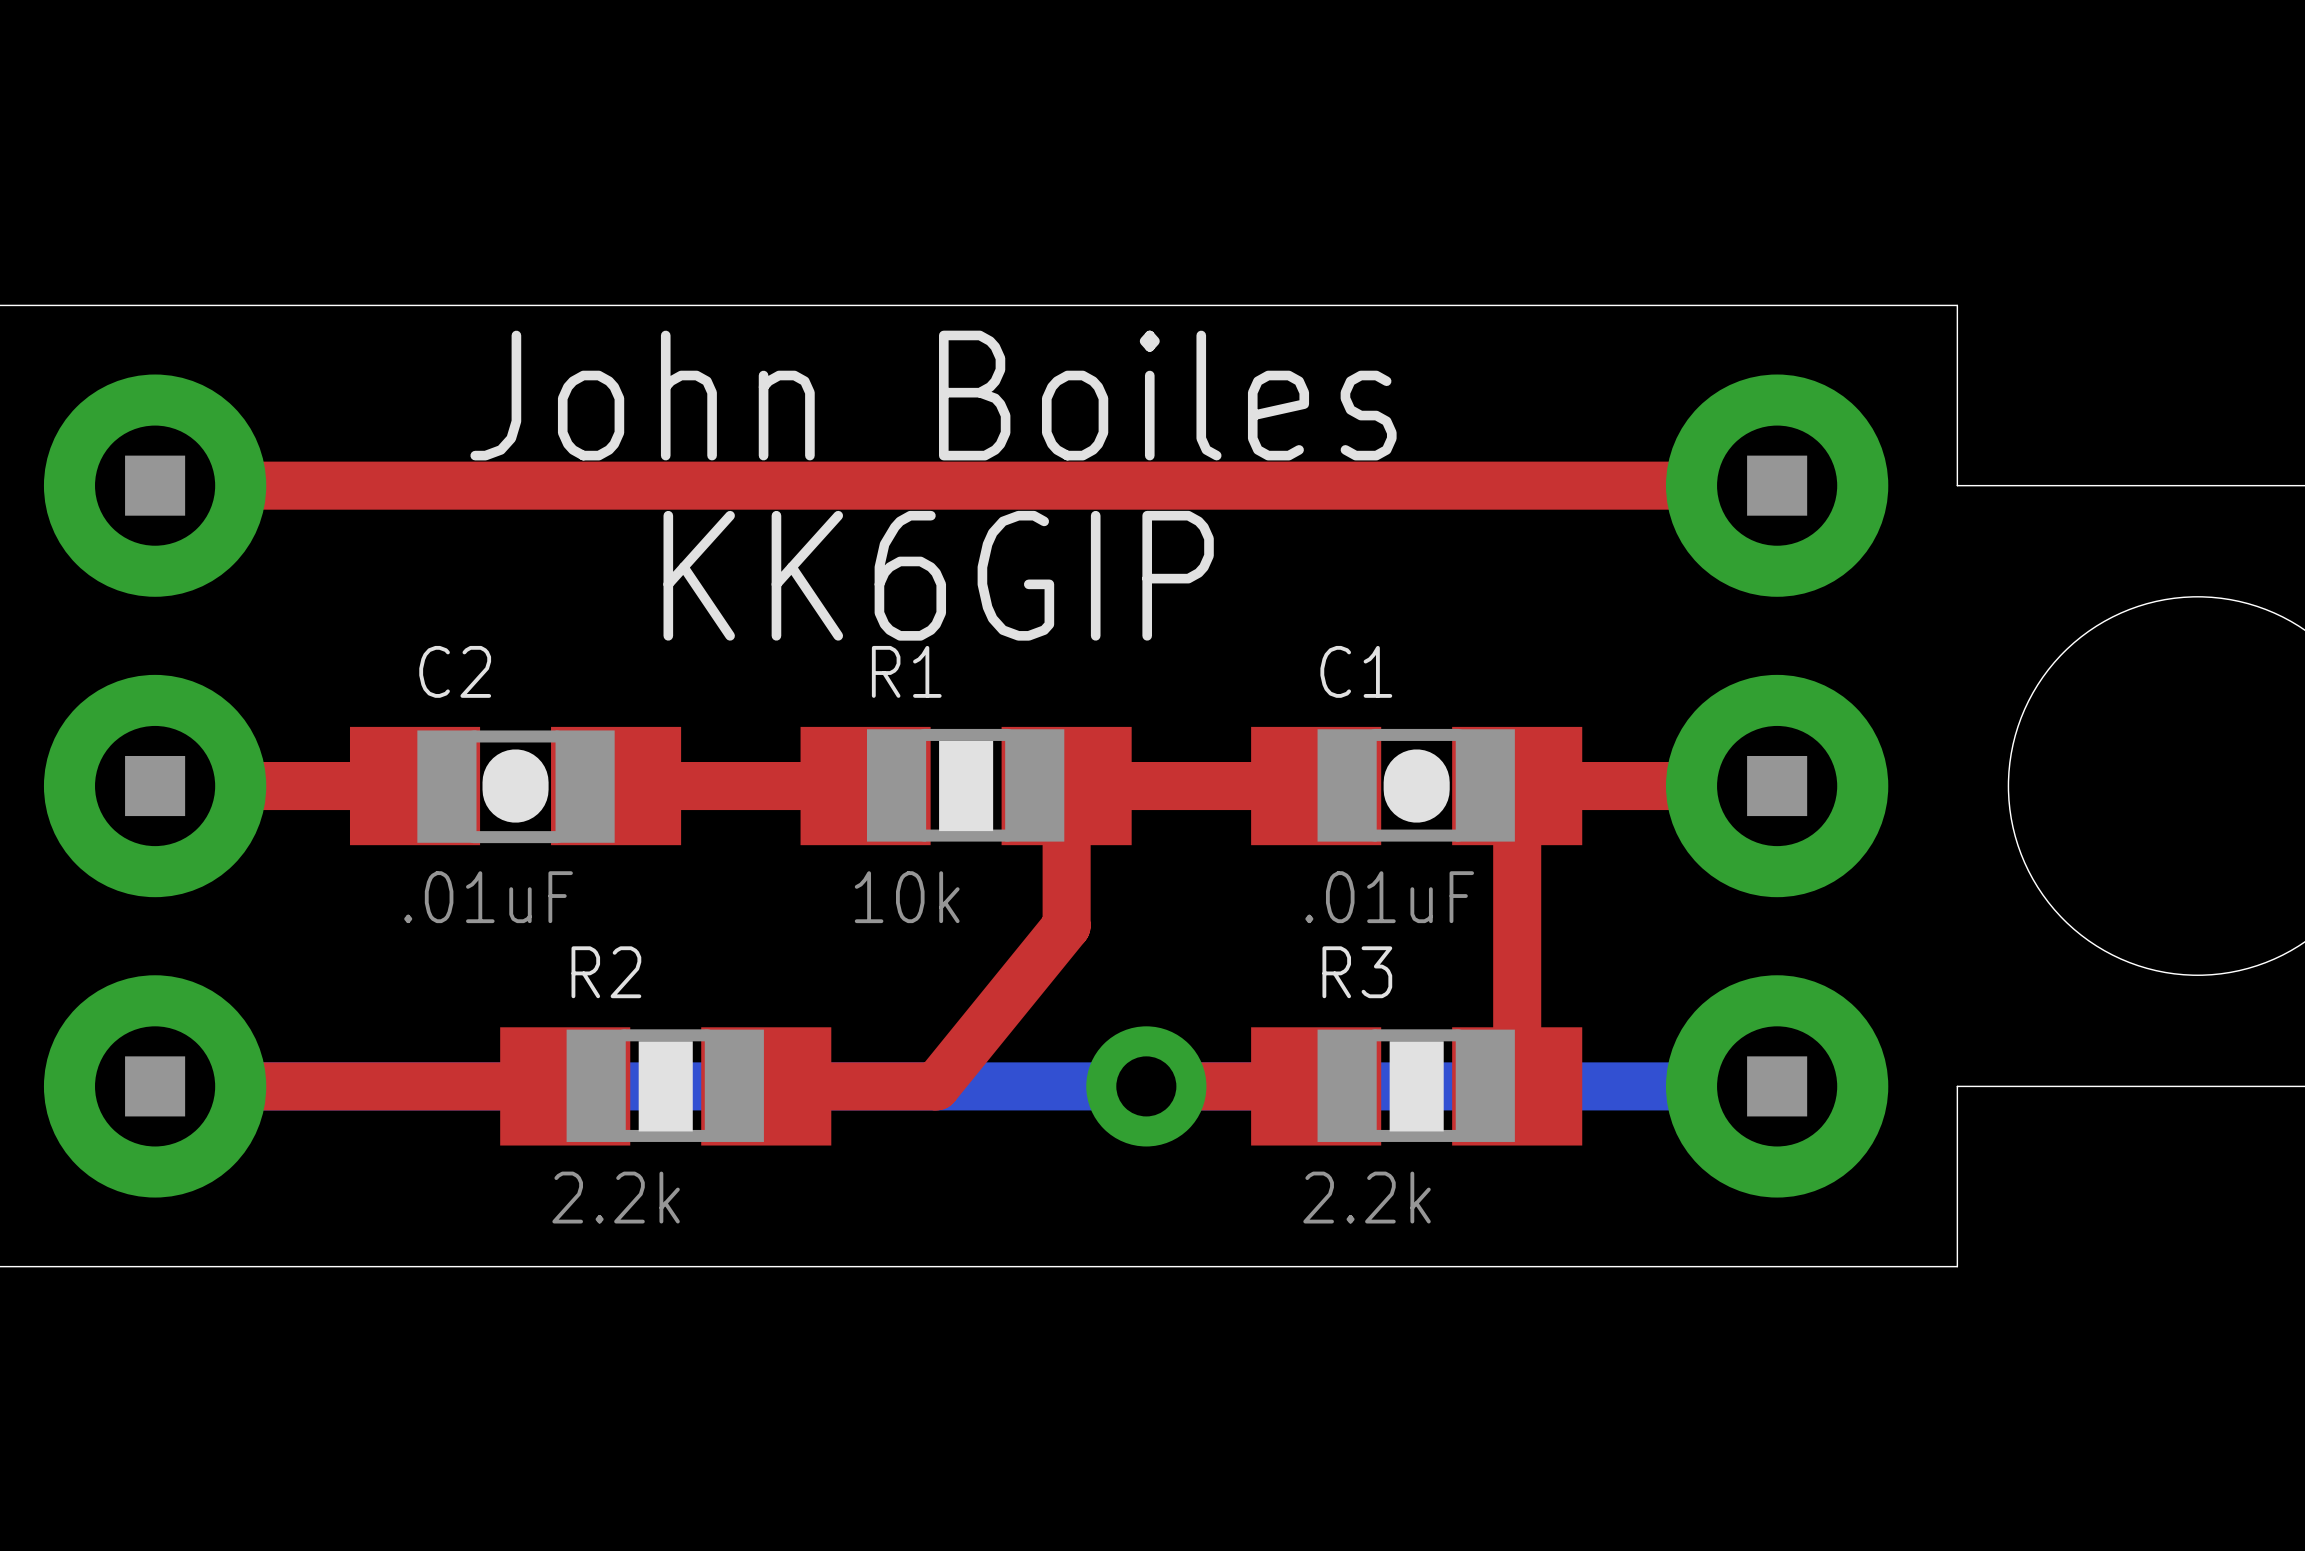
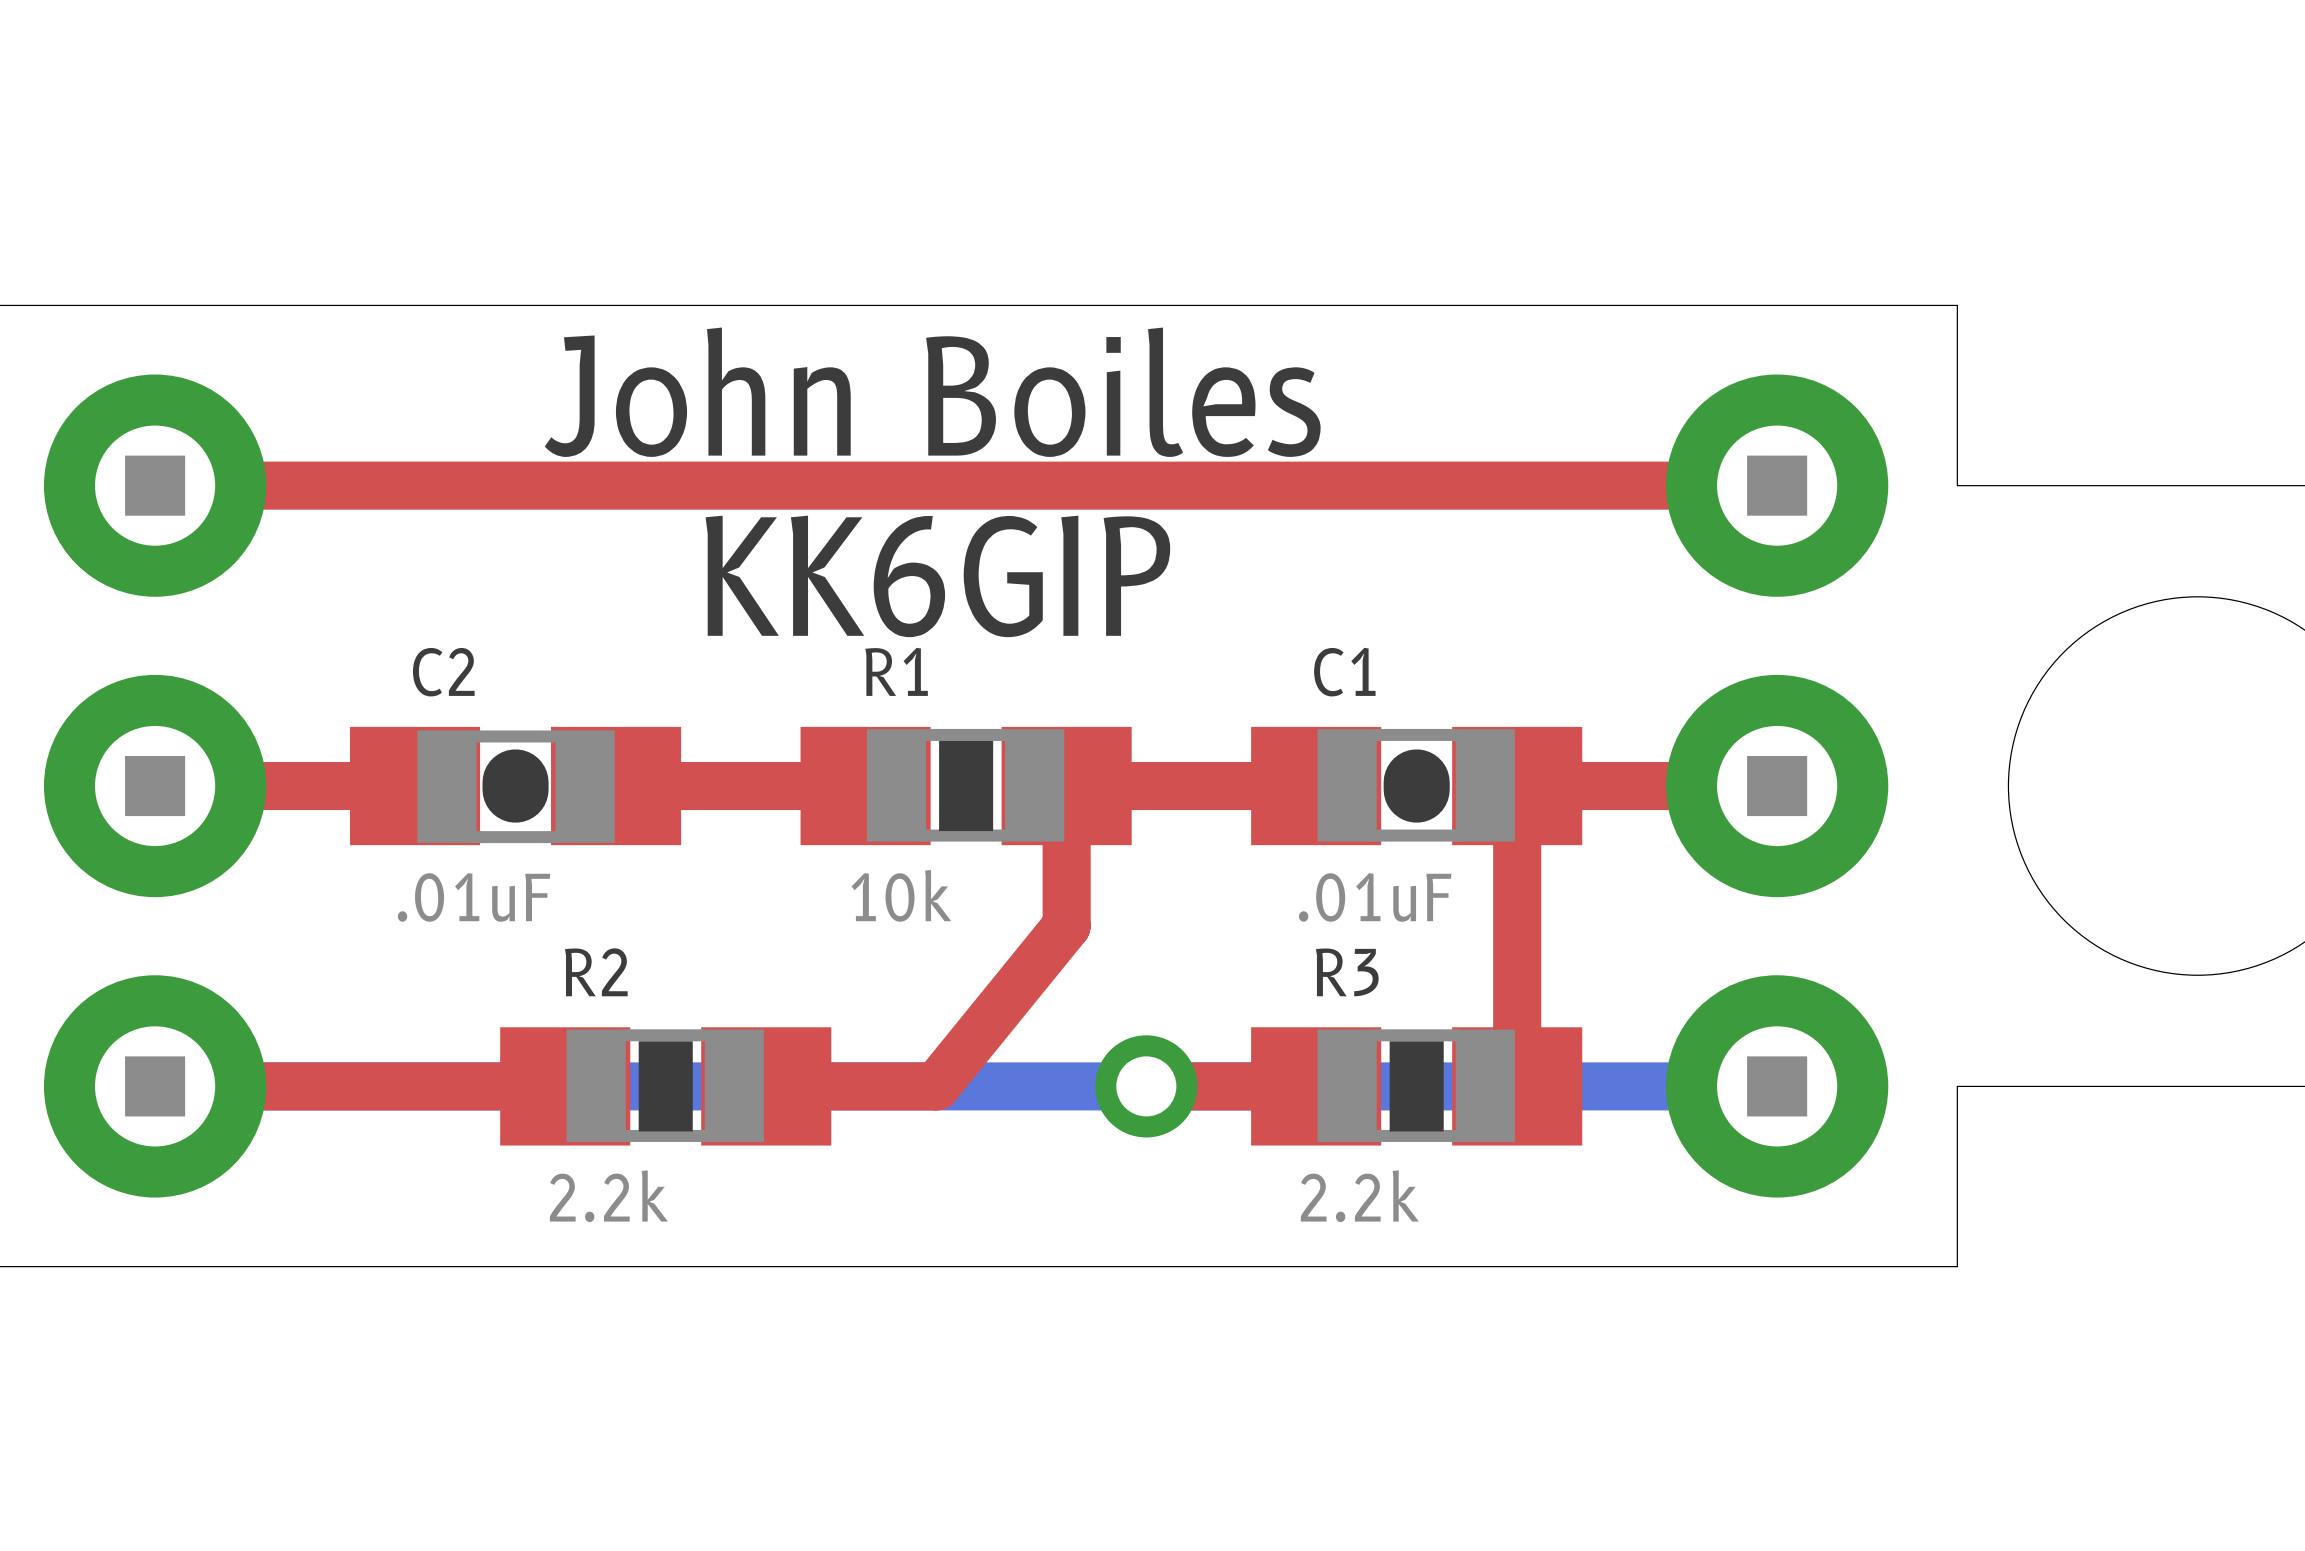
via size: [1086, 1026, 1207, 1147] -> [1095, 1035, 1198, 1138]

